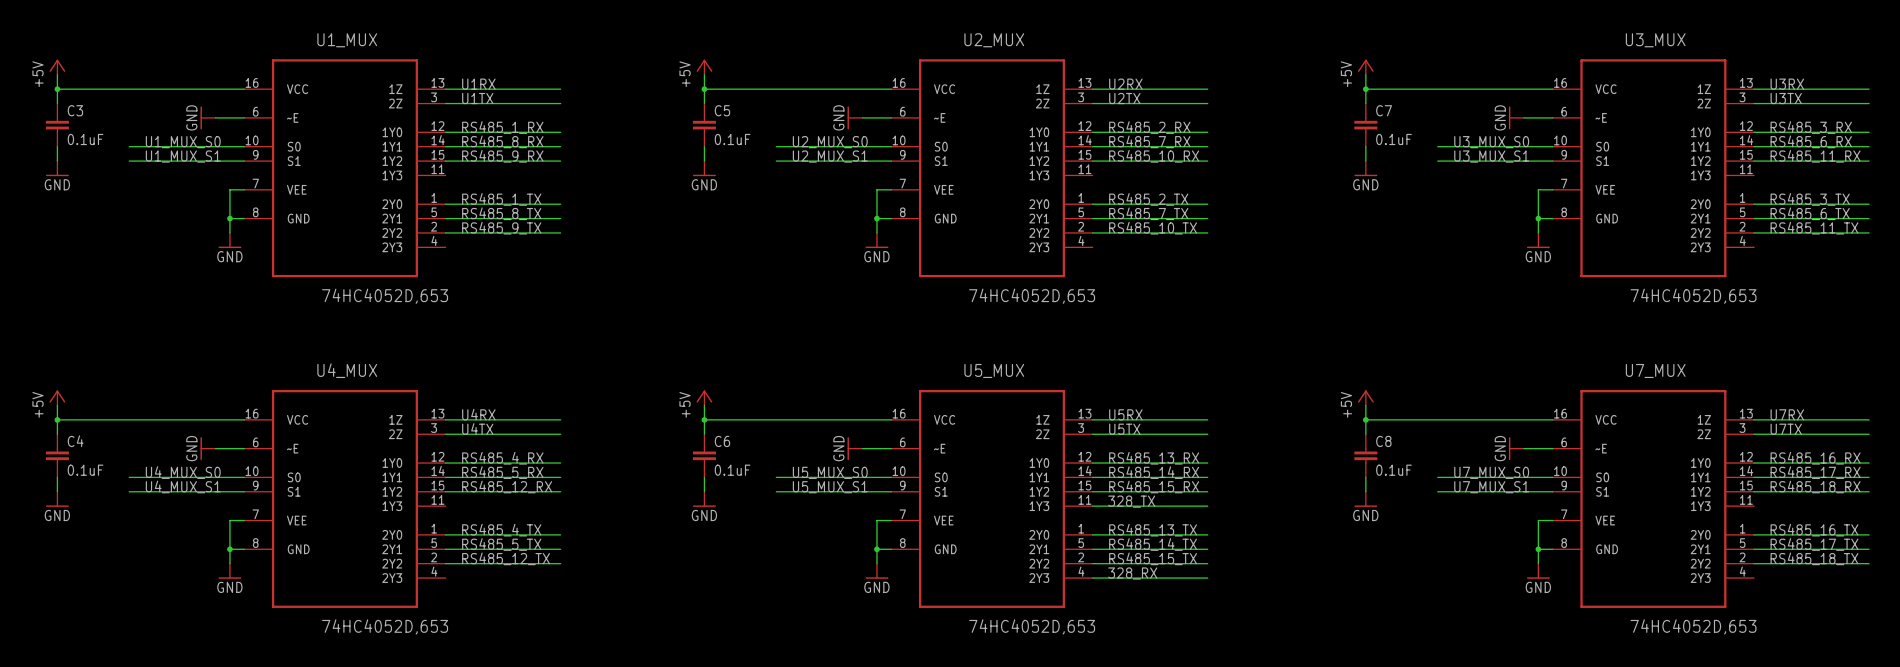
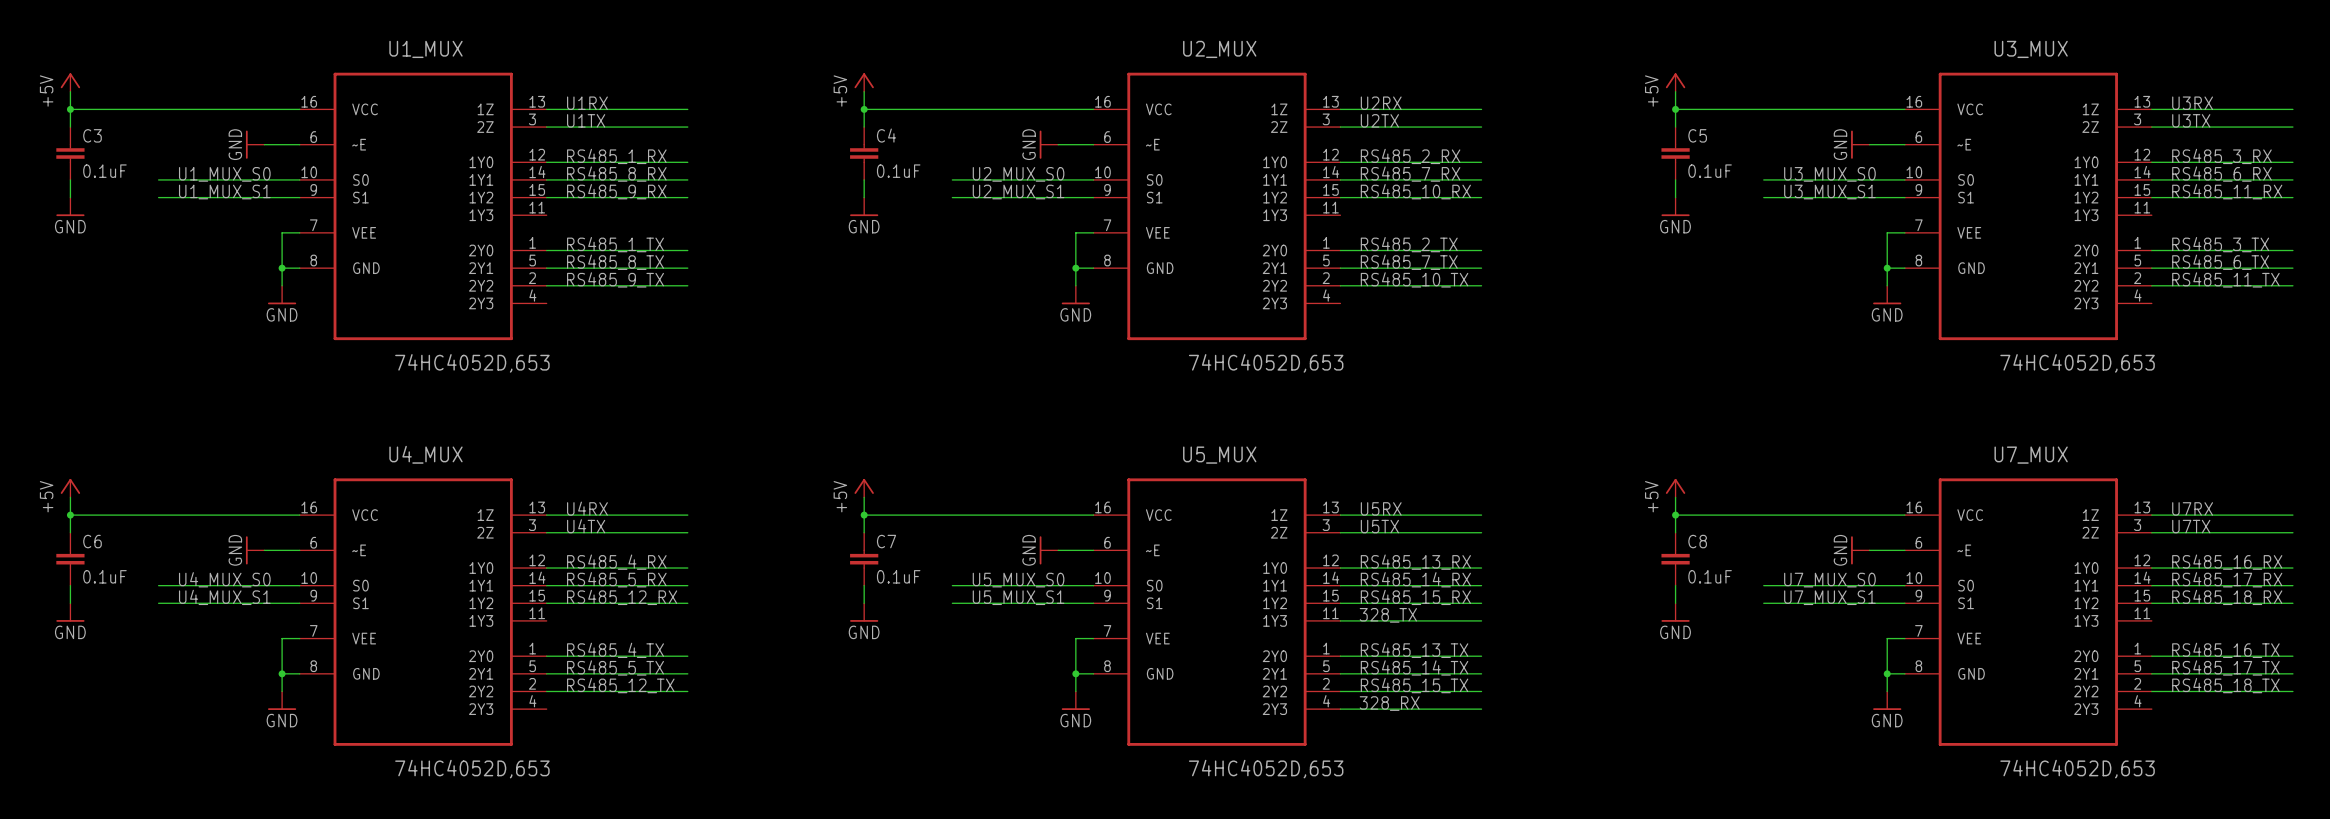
C5 name: C5 (722, 110) -> C4 (886, 135)
C7 name: C7 (1384, 110) -> C5 (1697, 135)
C4 name: C4 (75, 441) -> C6 (92, 541)
C6 name: C6 (722, 441) -> C7 (886, 541)

